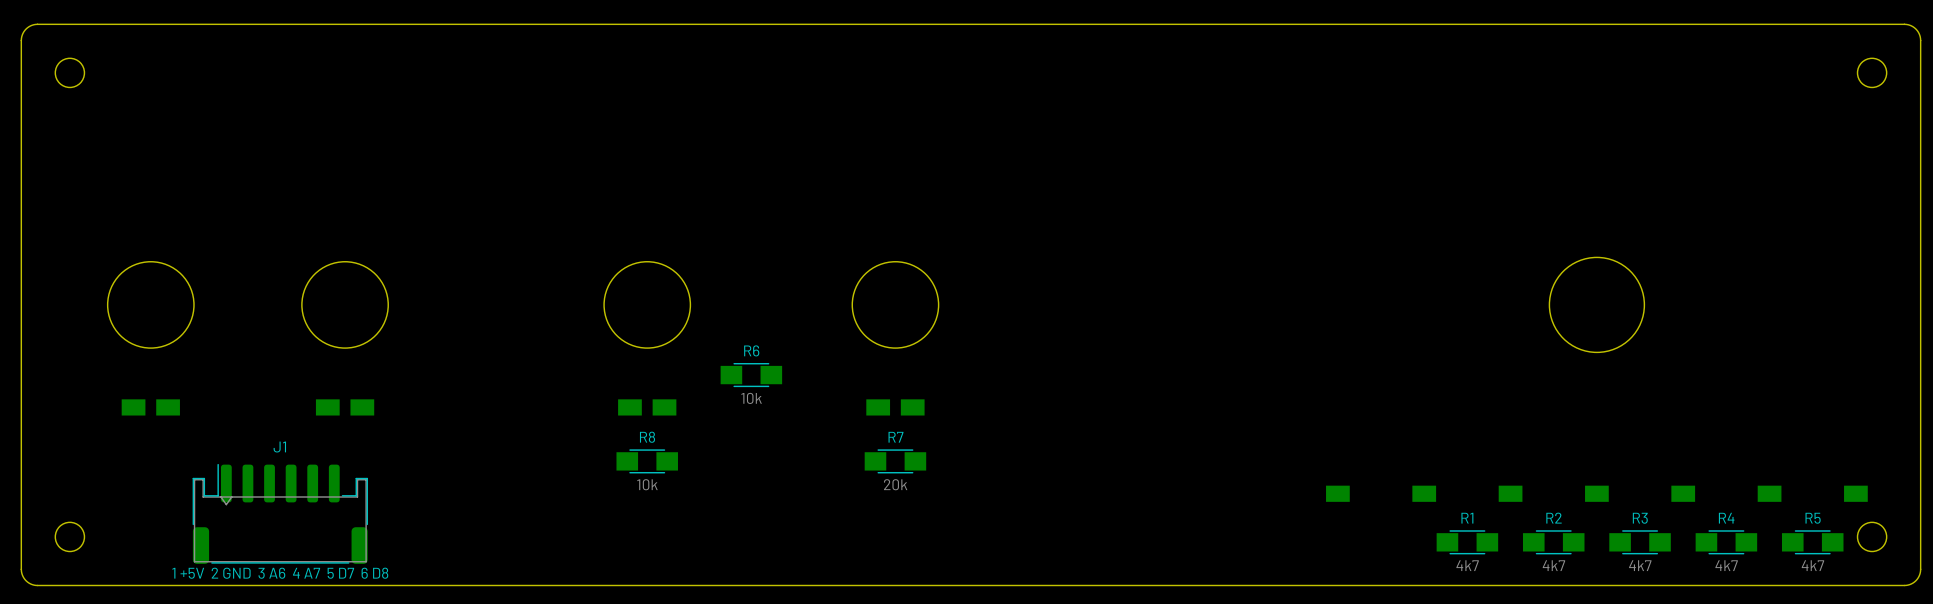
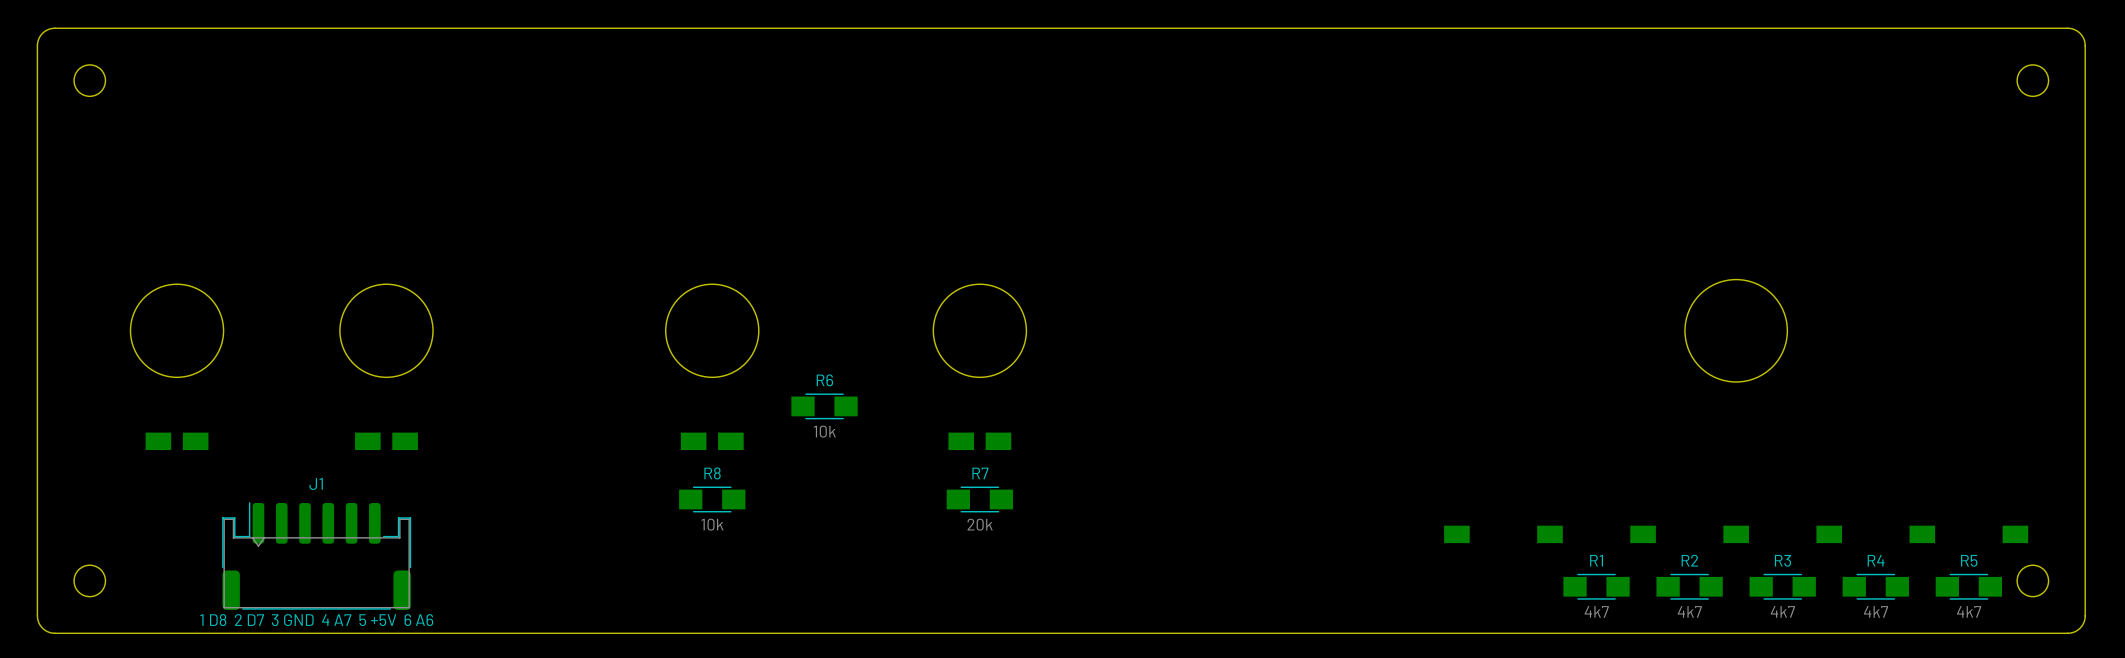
text: 1 +5V 2 GND 3 A6 4 A7 5 D7 6 D8 (280, 573) -> 1 D8 2 D7 3 GND 4 A7 5 +5V 6 A6 (316, 620)

